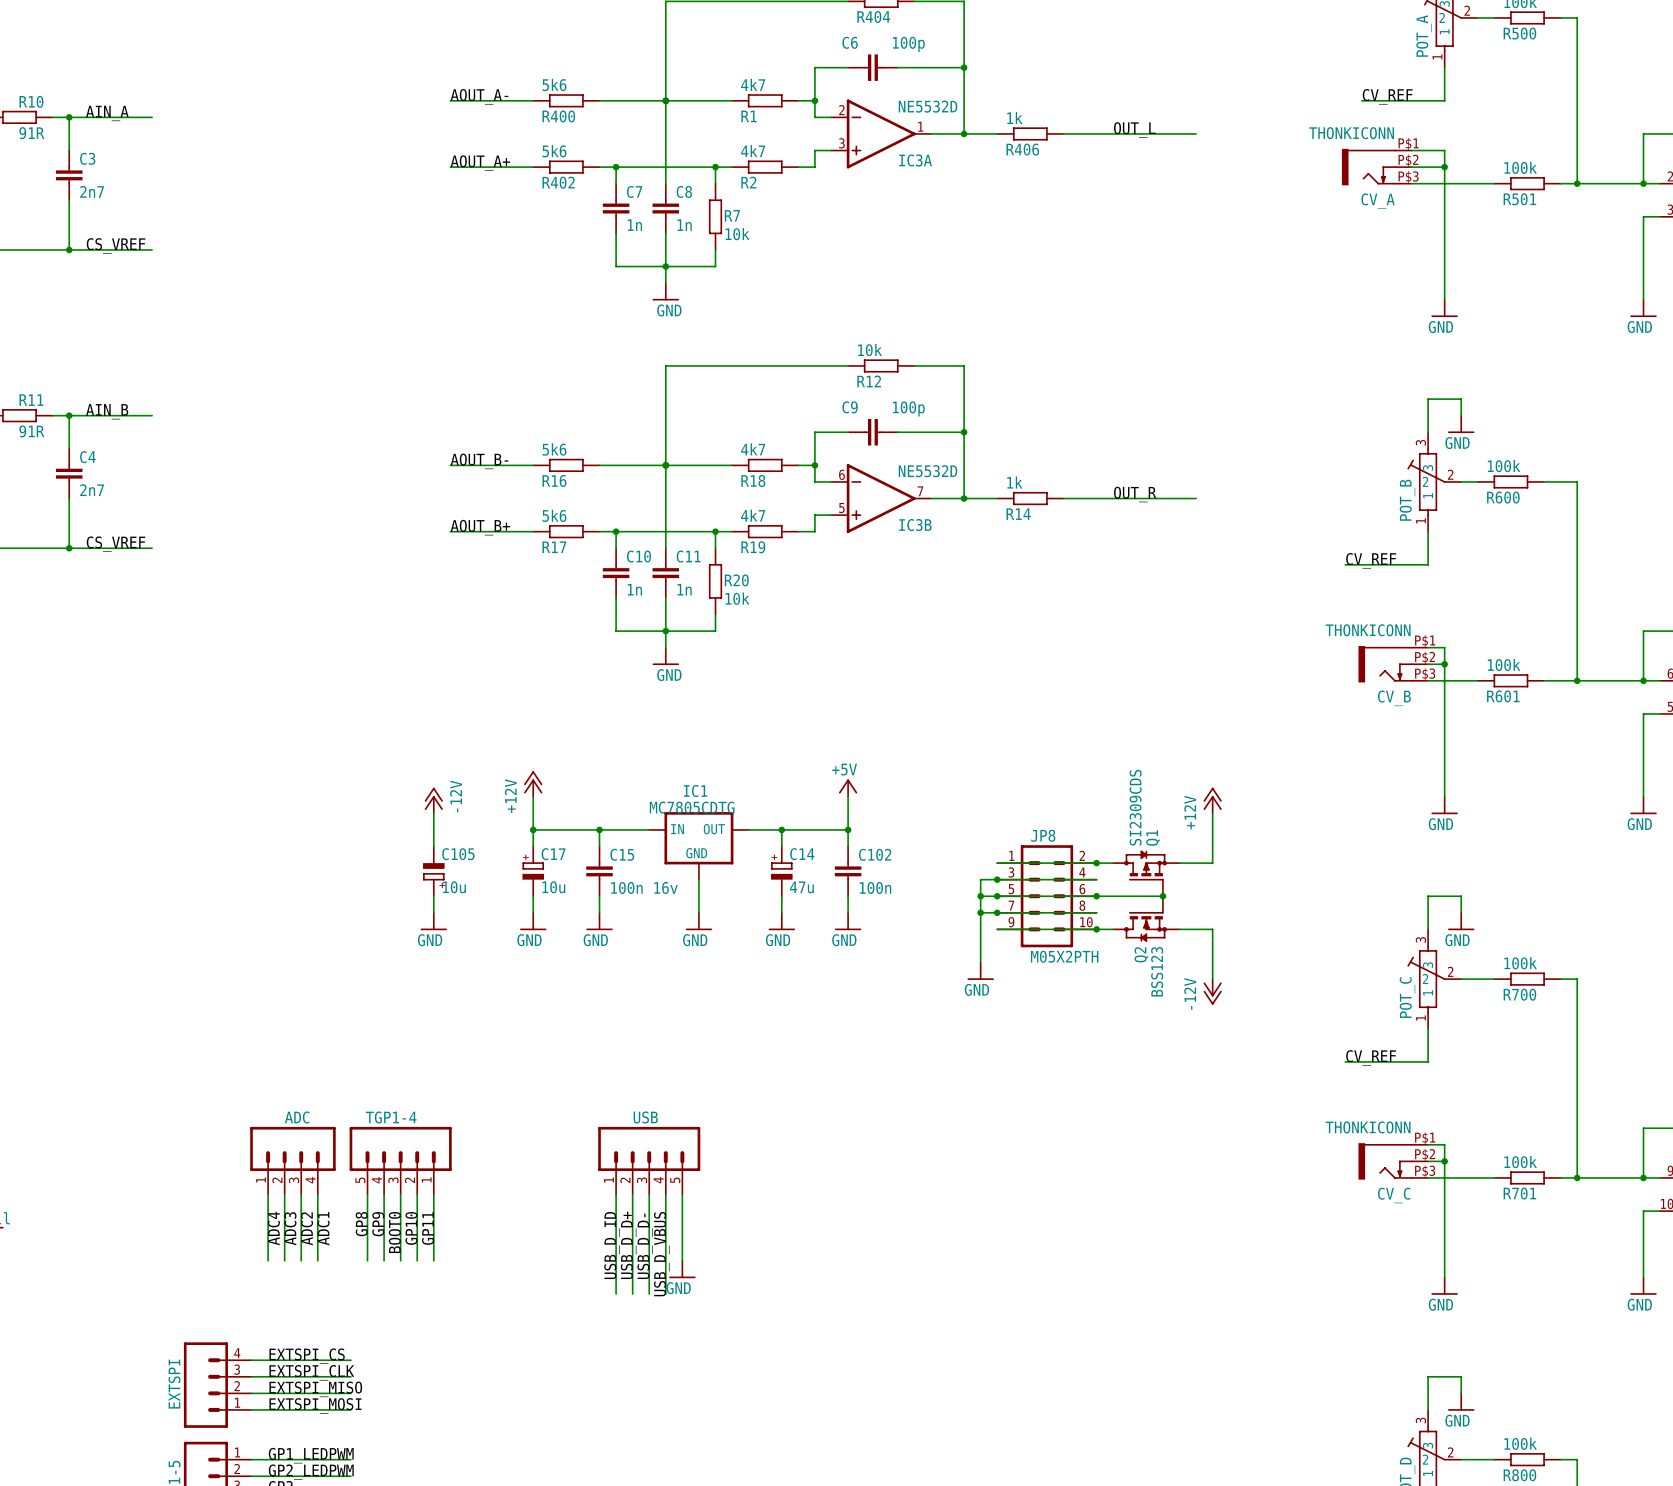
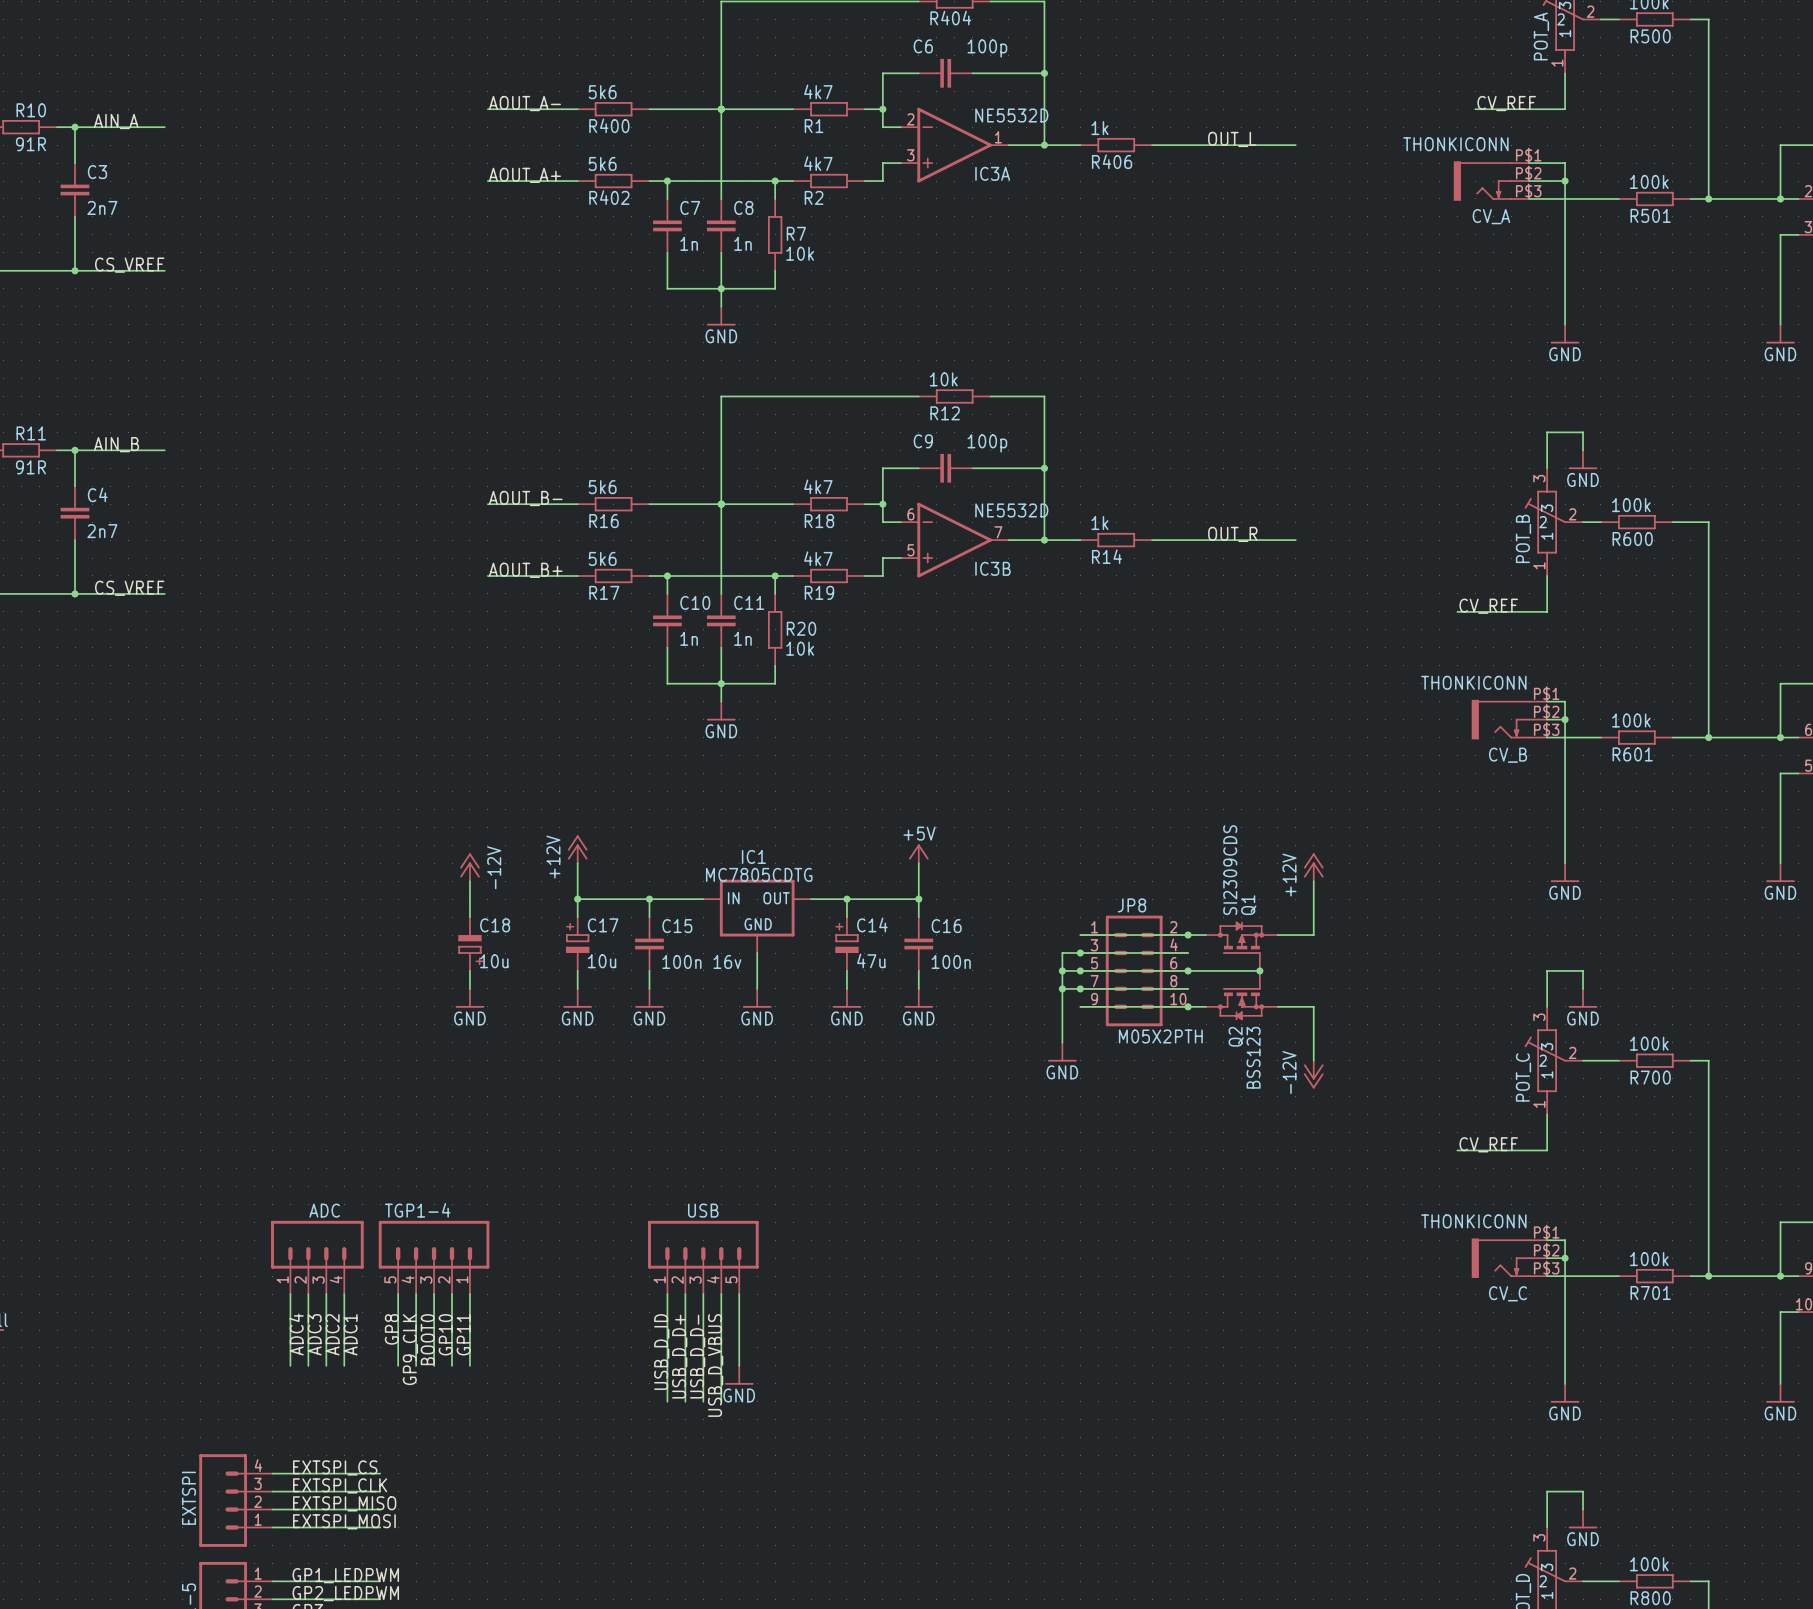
C105 name: C105 (458, 854) -> C18 (495, 925)
C102 name: C102 (875, 854) -> C16 (946, 926)
label: GP9 (378, 1224) -> GP9_CLK (410, 1349)

